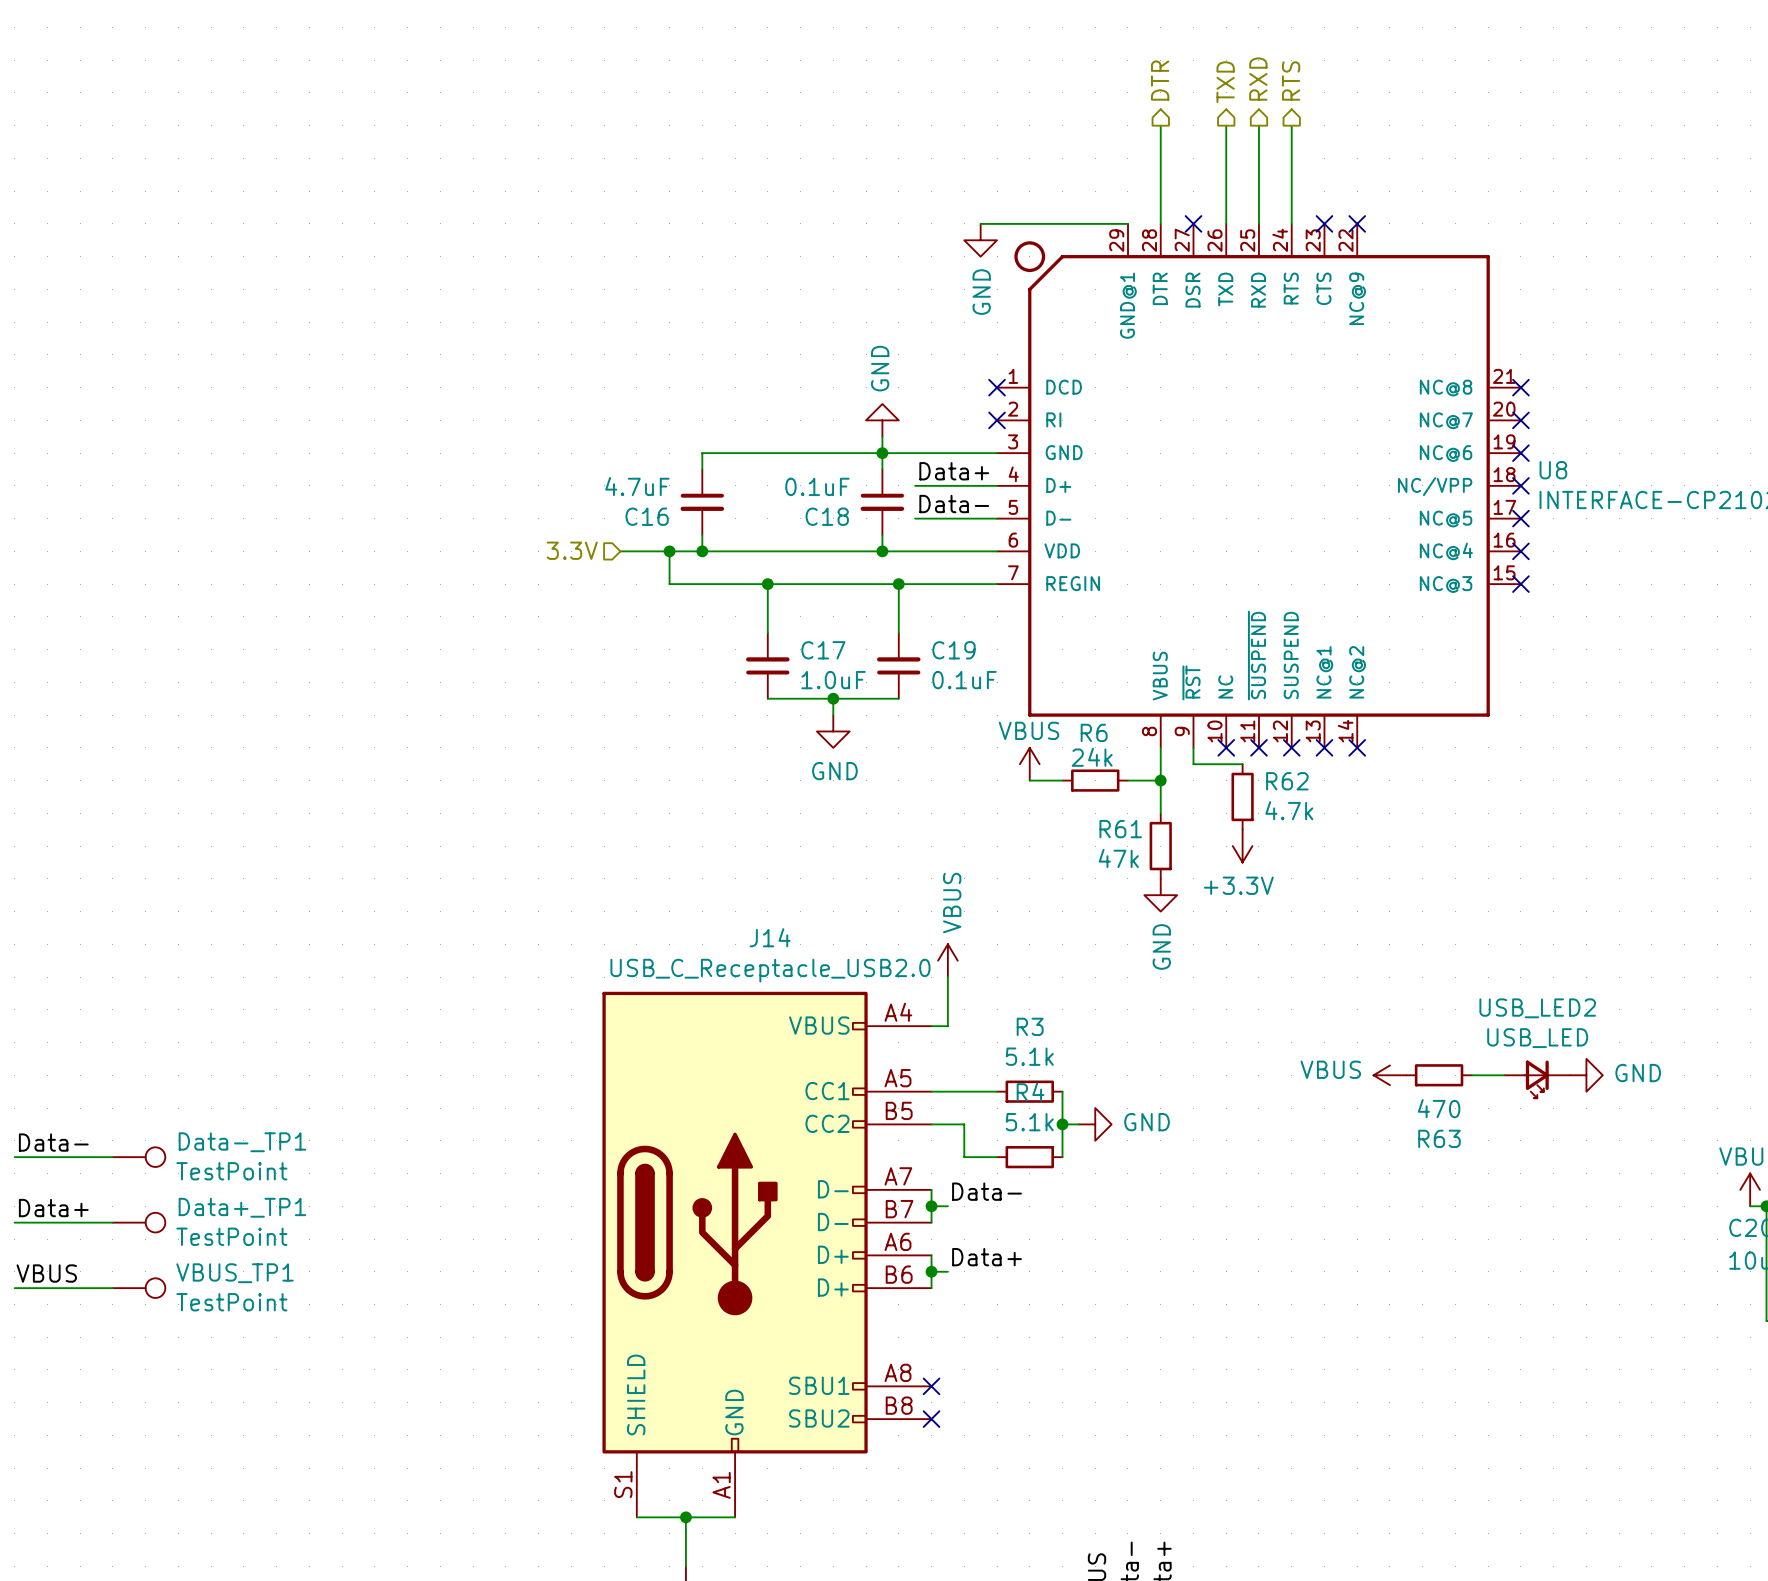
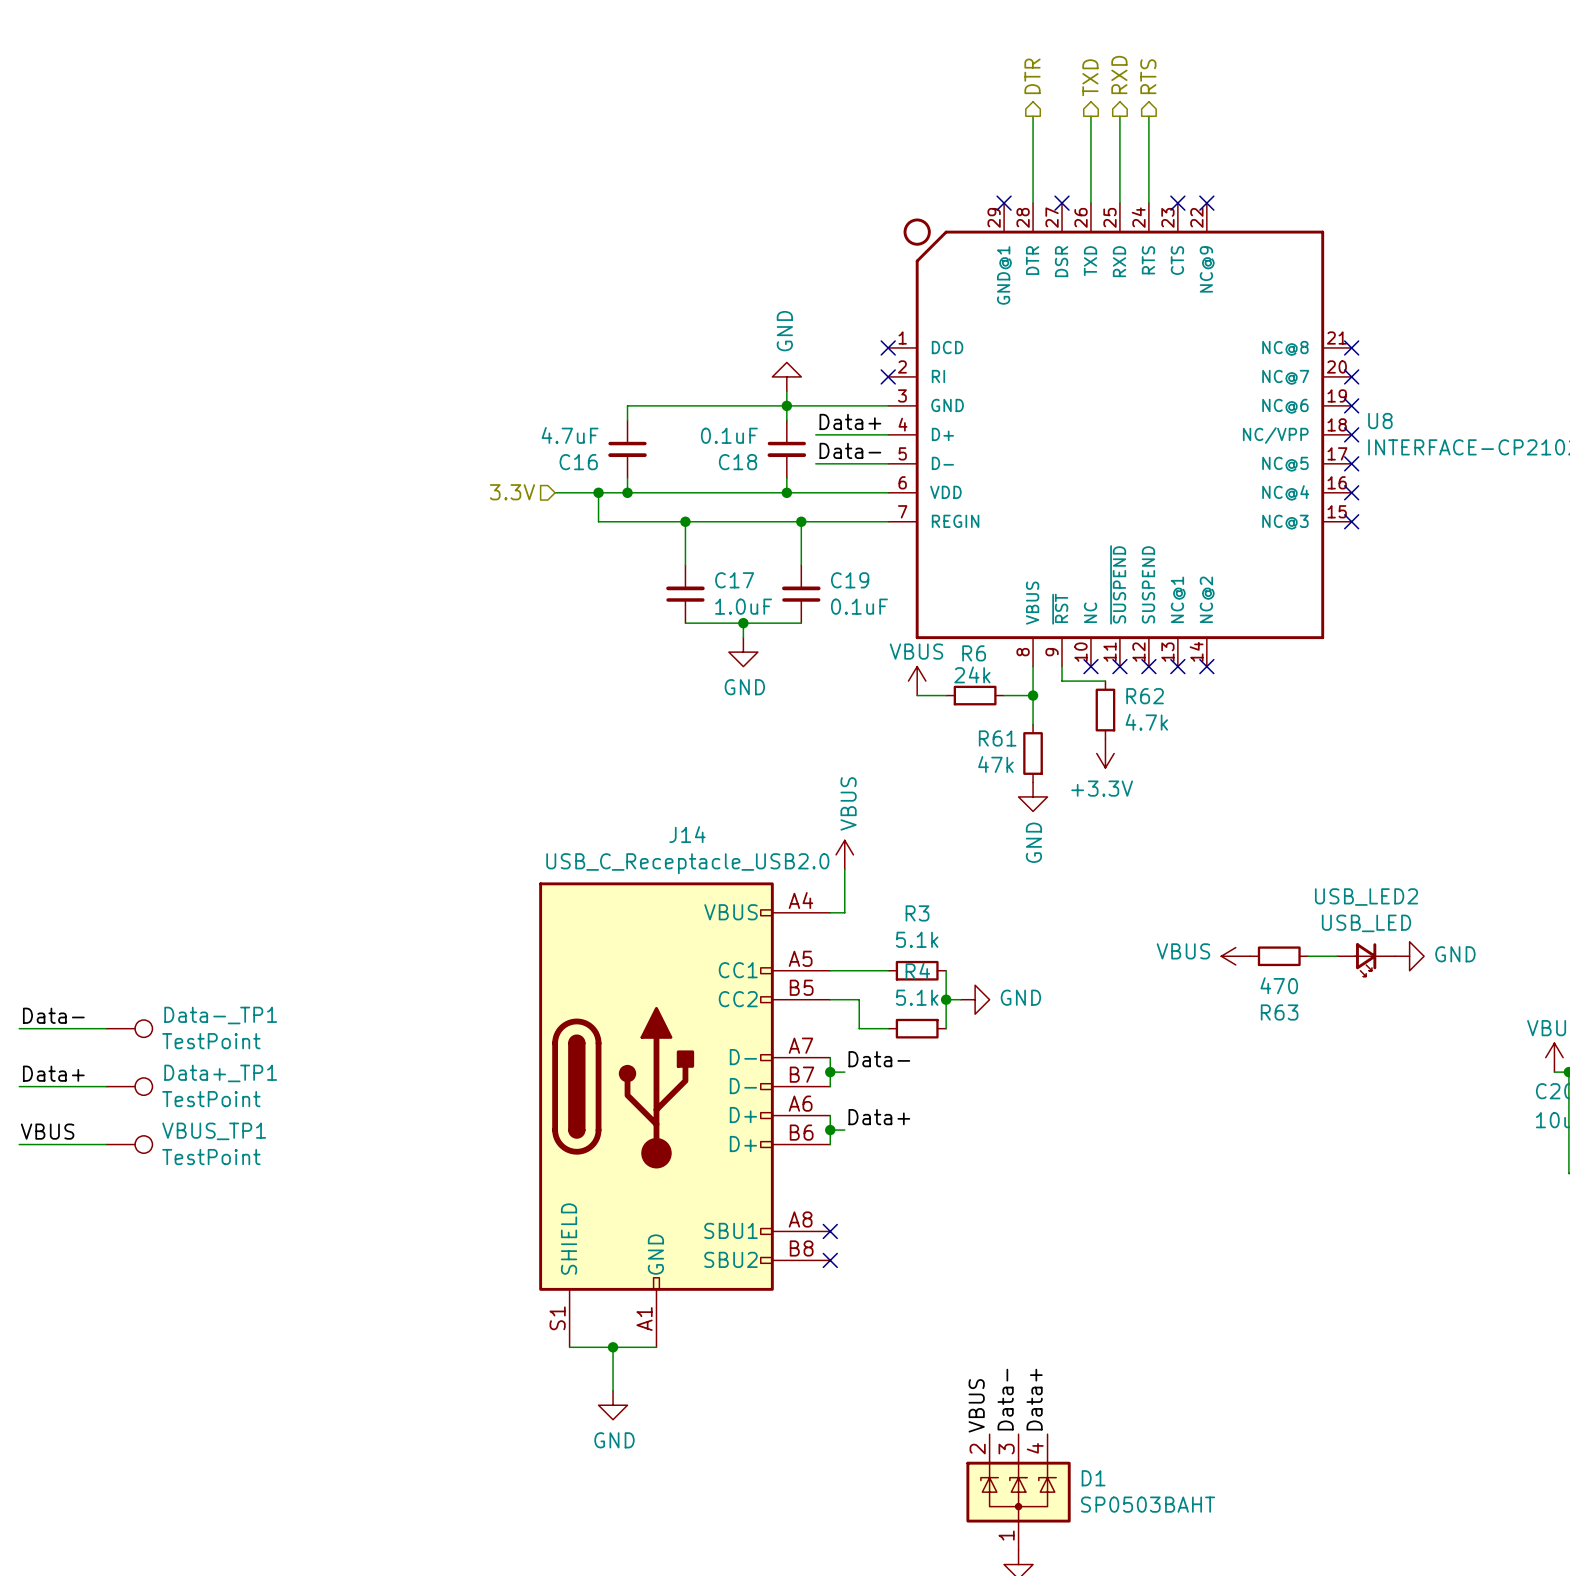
wire: (980, 223) (1127, 223) -> none
no-connect mark: none -> (1004, 203)
power symbol: GND (980, 240) -> none

